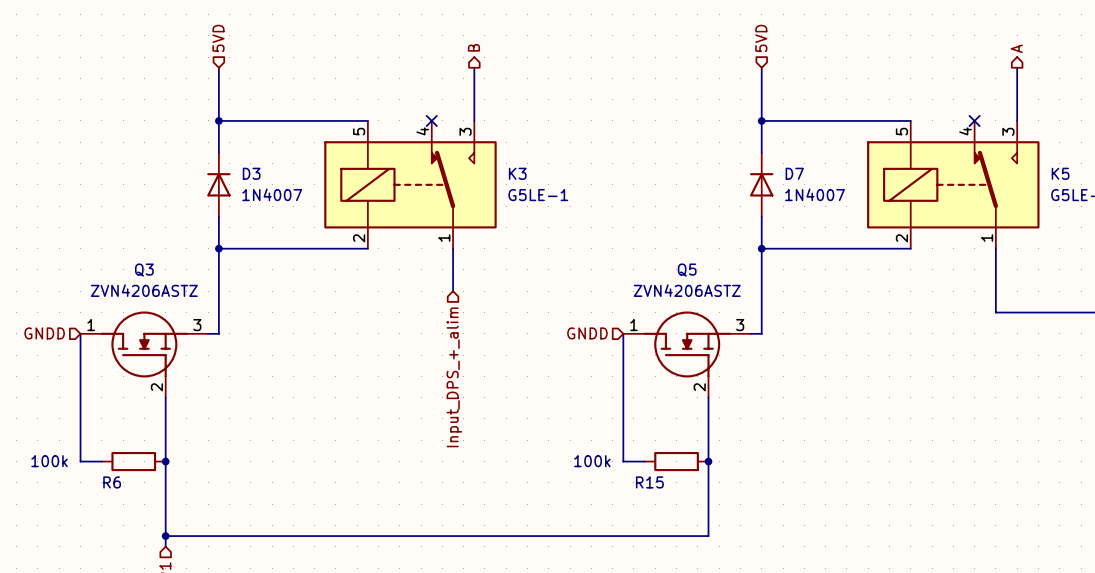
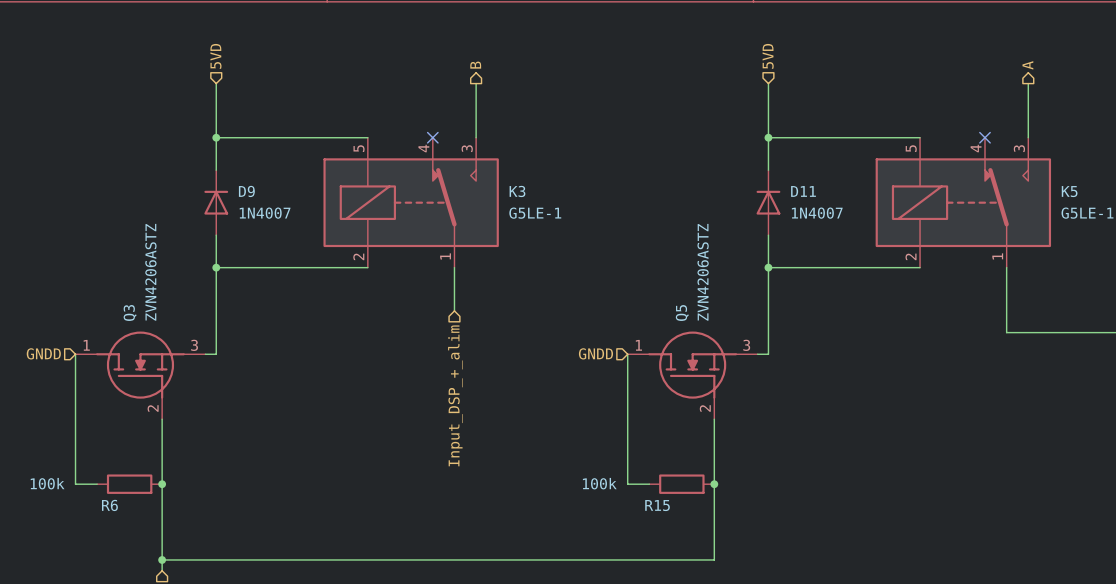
D3 name: D3 (251, 173) -> D9 (246, 191)
D7 name: D7 (794, 173) -> D11 (803, 191)
Q3 name rotation: 0° (144, 270) -> 90° counterclockwise (130, 312)
Q5 name rotation: 0° (687, 270) -> 90° counterclockwise (682, 313)
Q3 value rotation: 0° (144, 290) -> 90° counterclockwise (150, 272)
Q5 value rotation: 0° (687, 290) -> 90° counterclockwise (703, 272)
hierarchical label: Input_DPS_+_alim (454, 377) -> Input_DSP_+_alim (455, 395)

